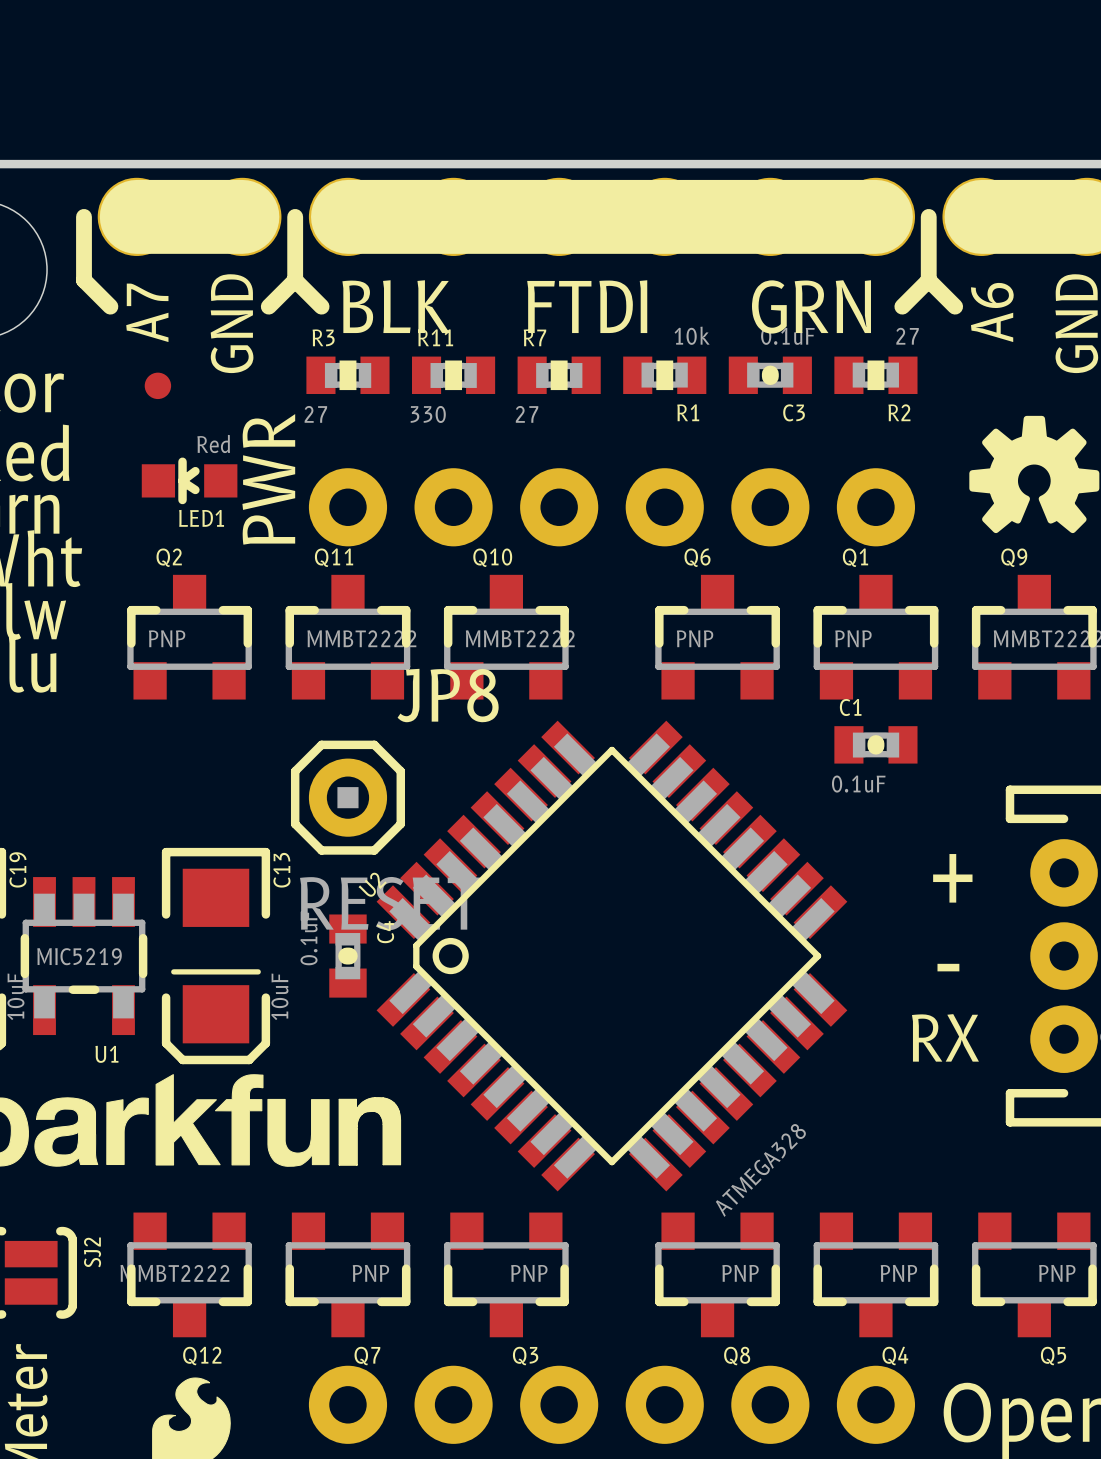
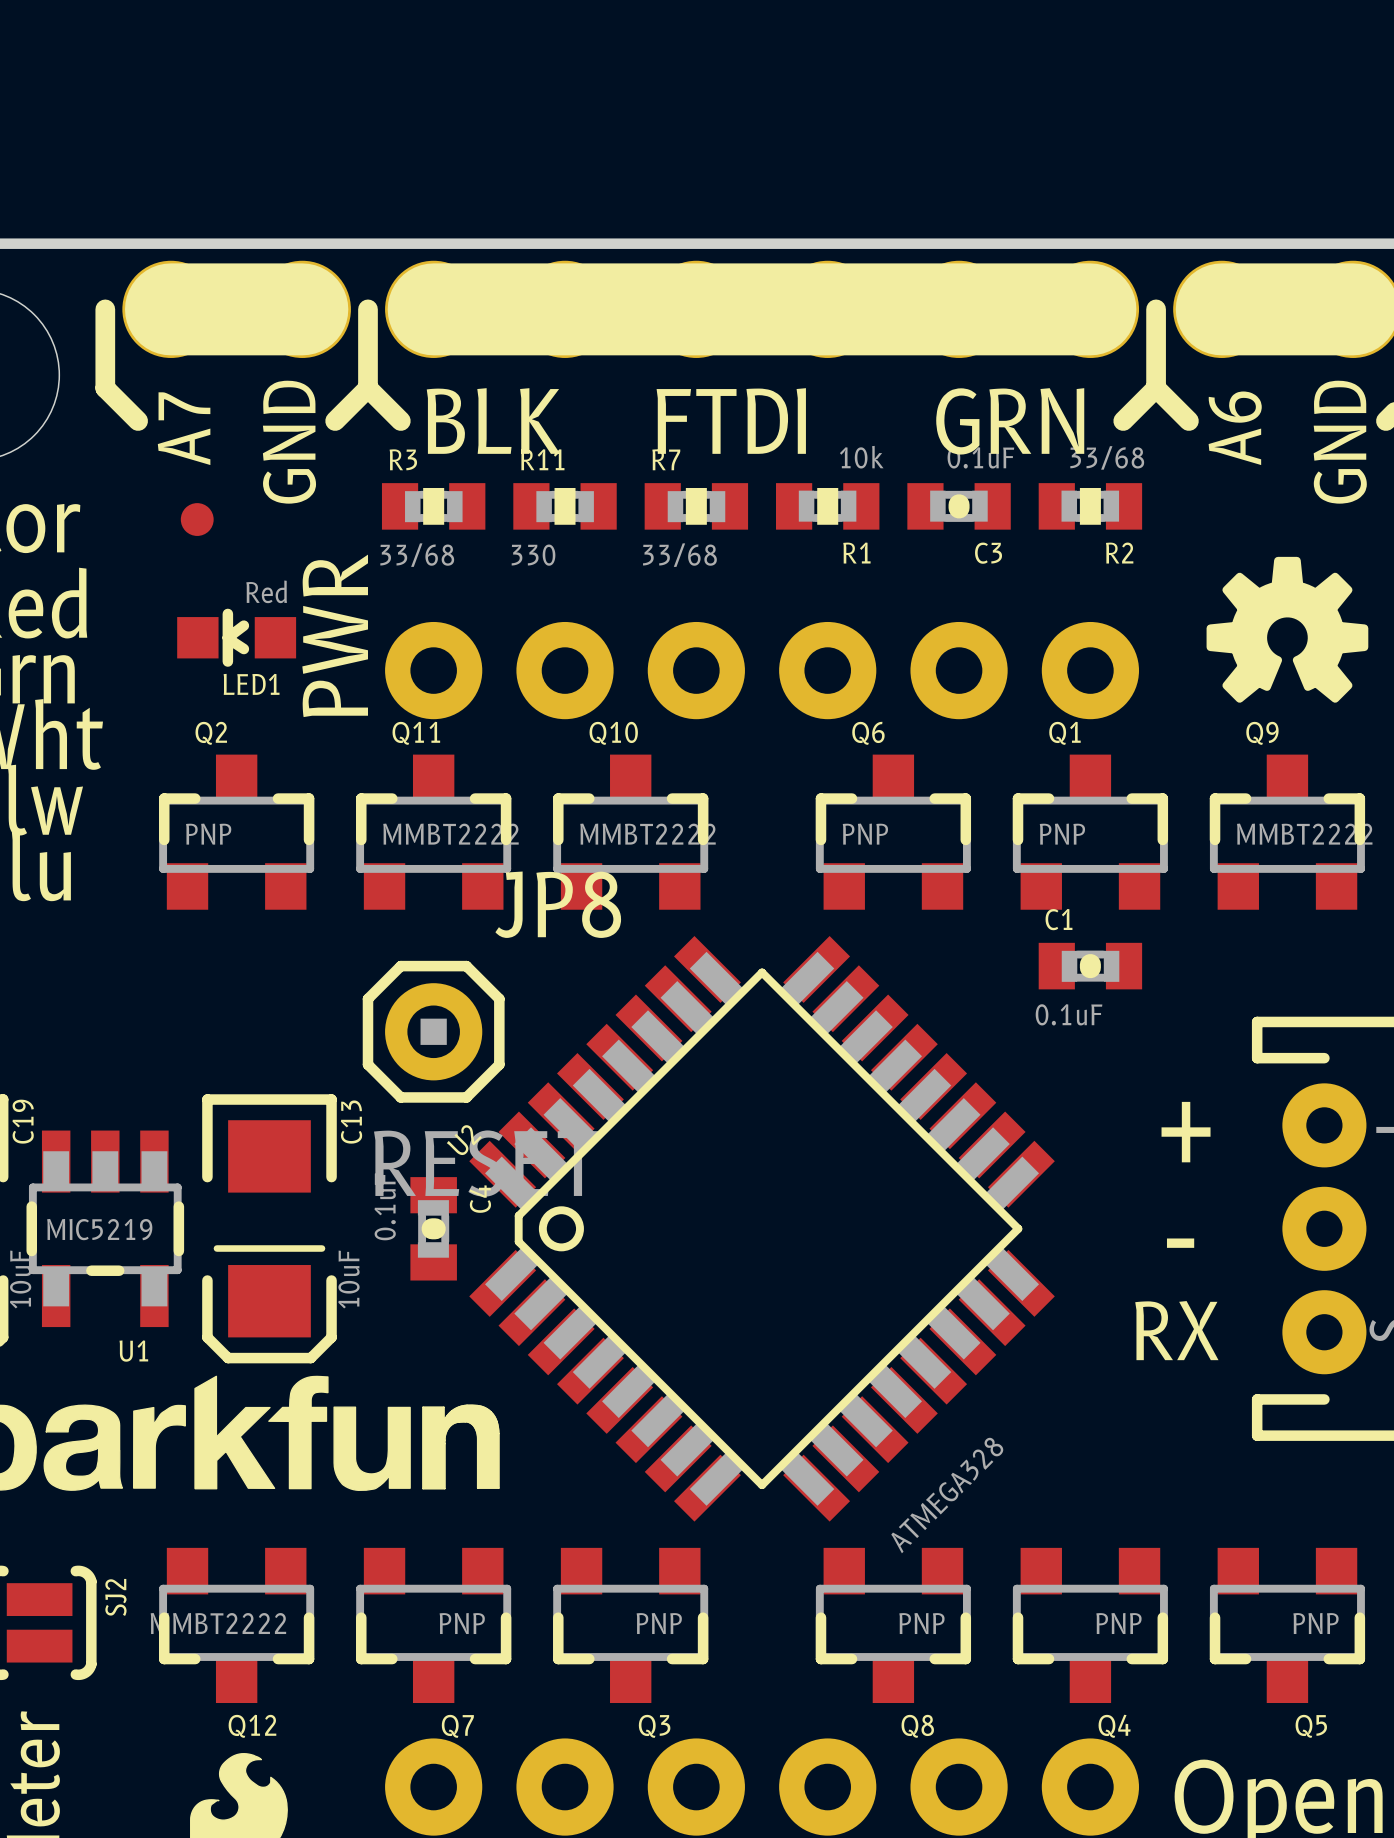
R2 value: 27 (907, 336) -> 33/68 (1107, 457)
R3 value: 27 (315, 414) -> 33/68 (417, 555)
R7 value: 27 (527, 414) -> 33/68 (679, 555)

